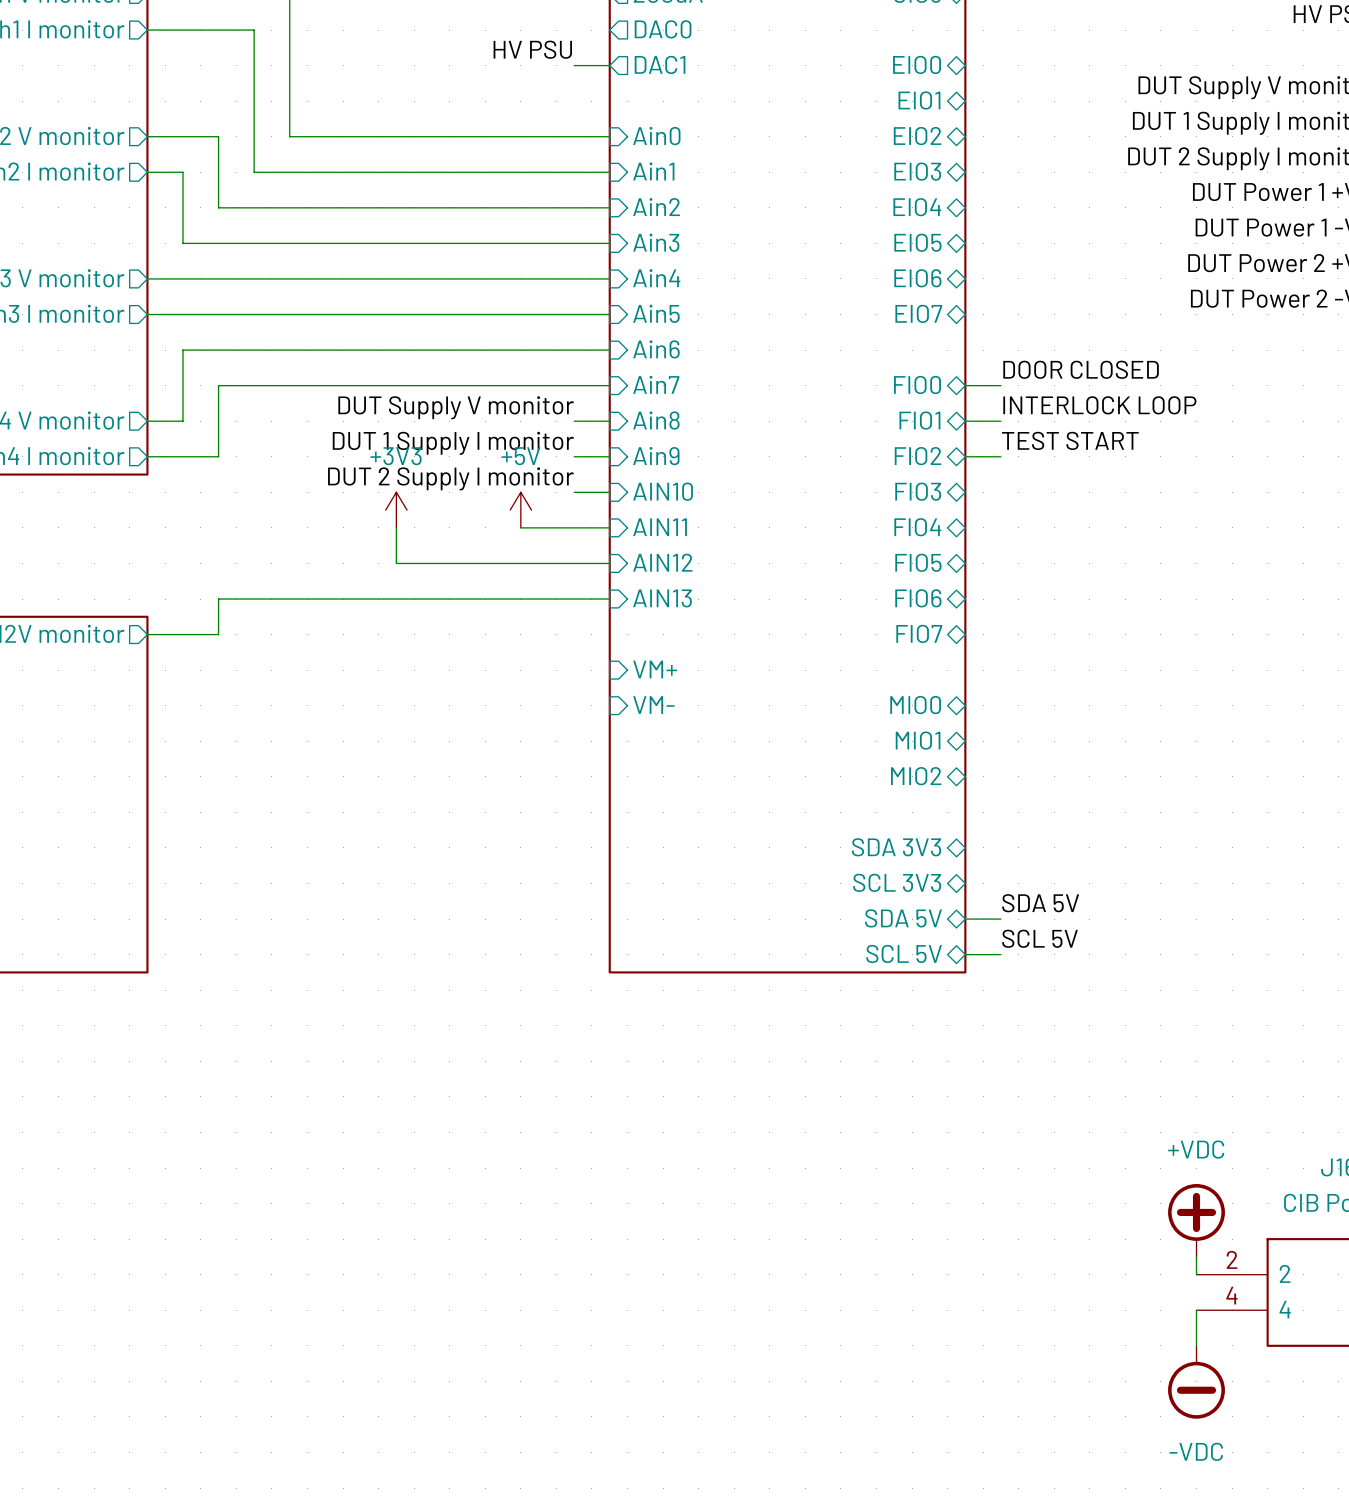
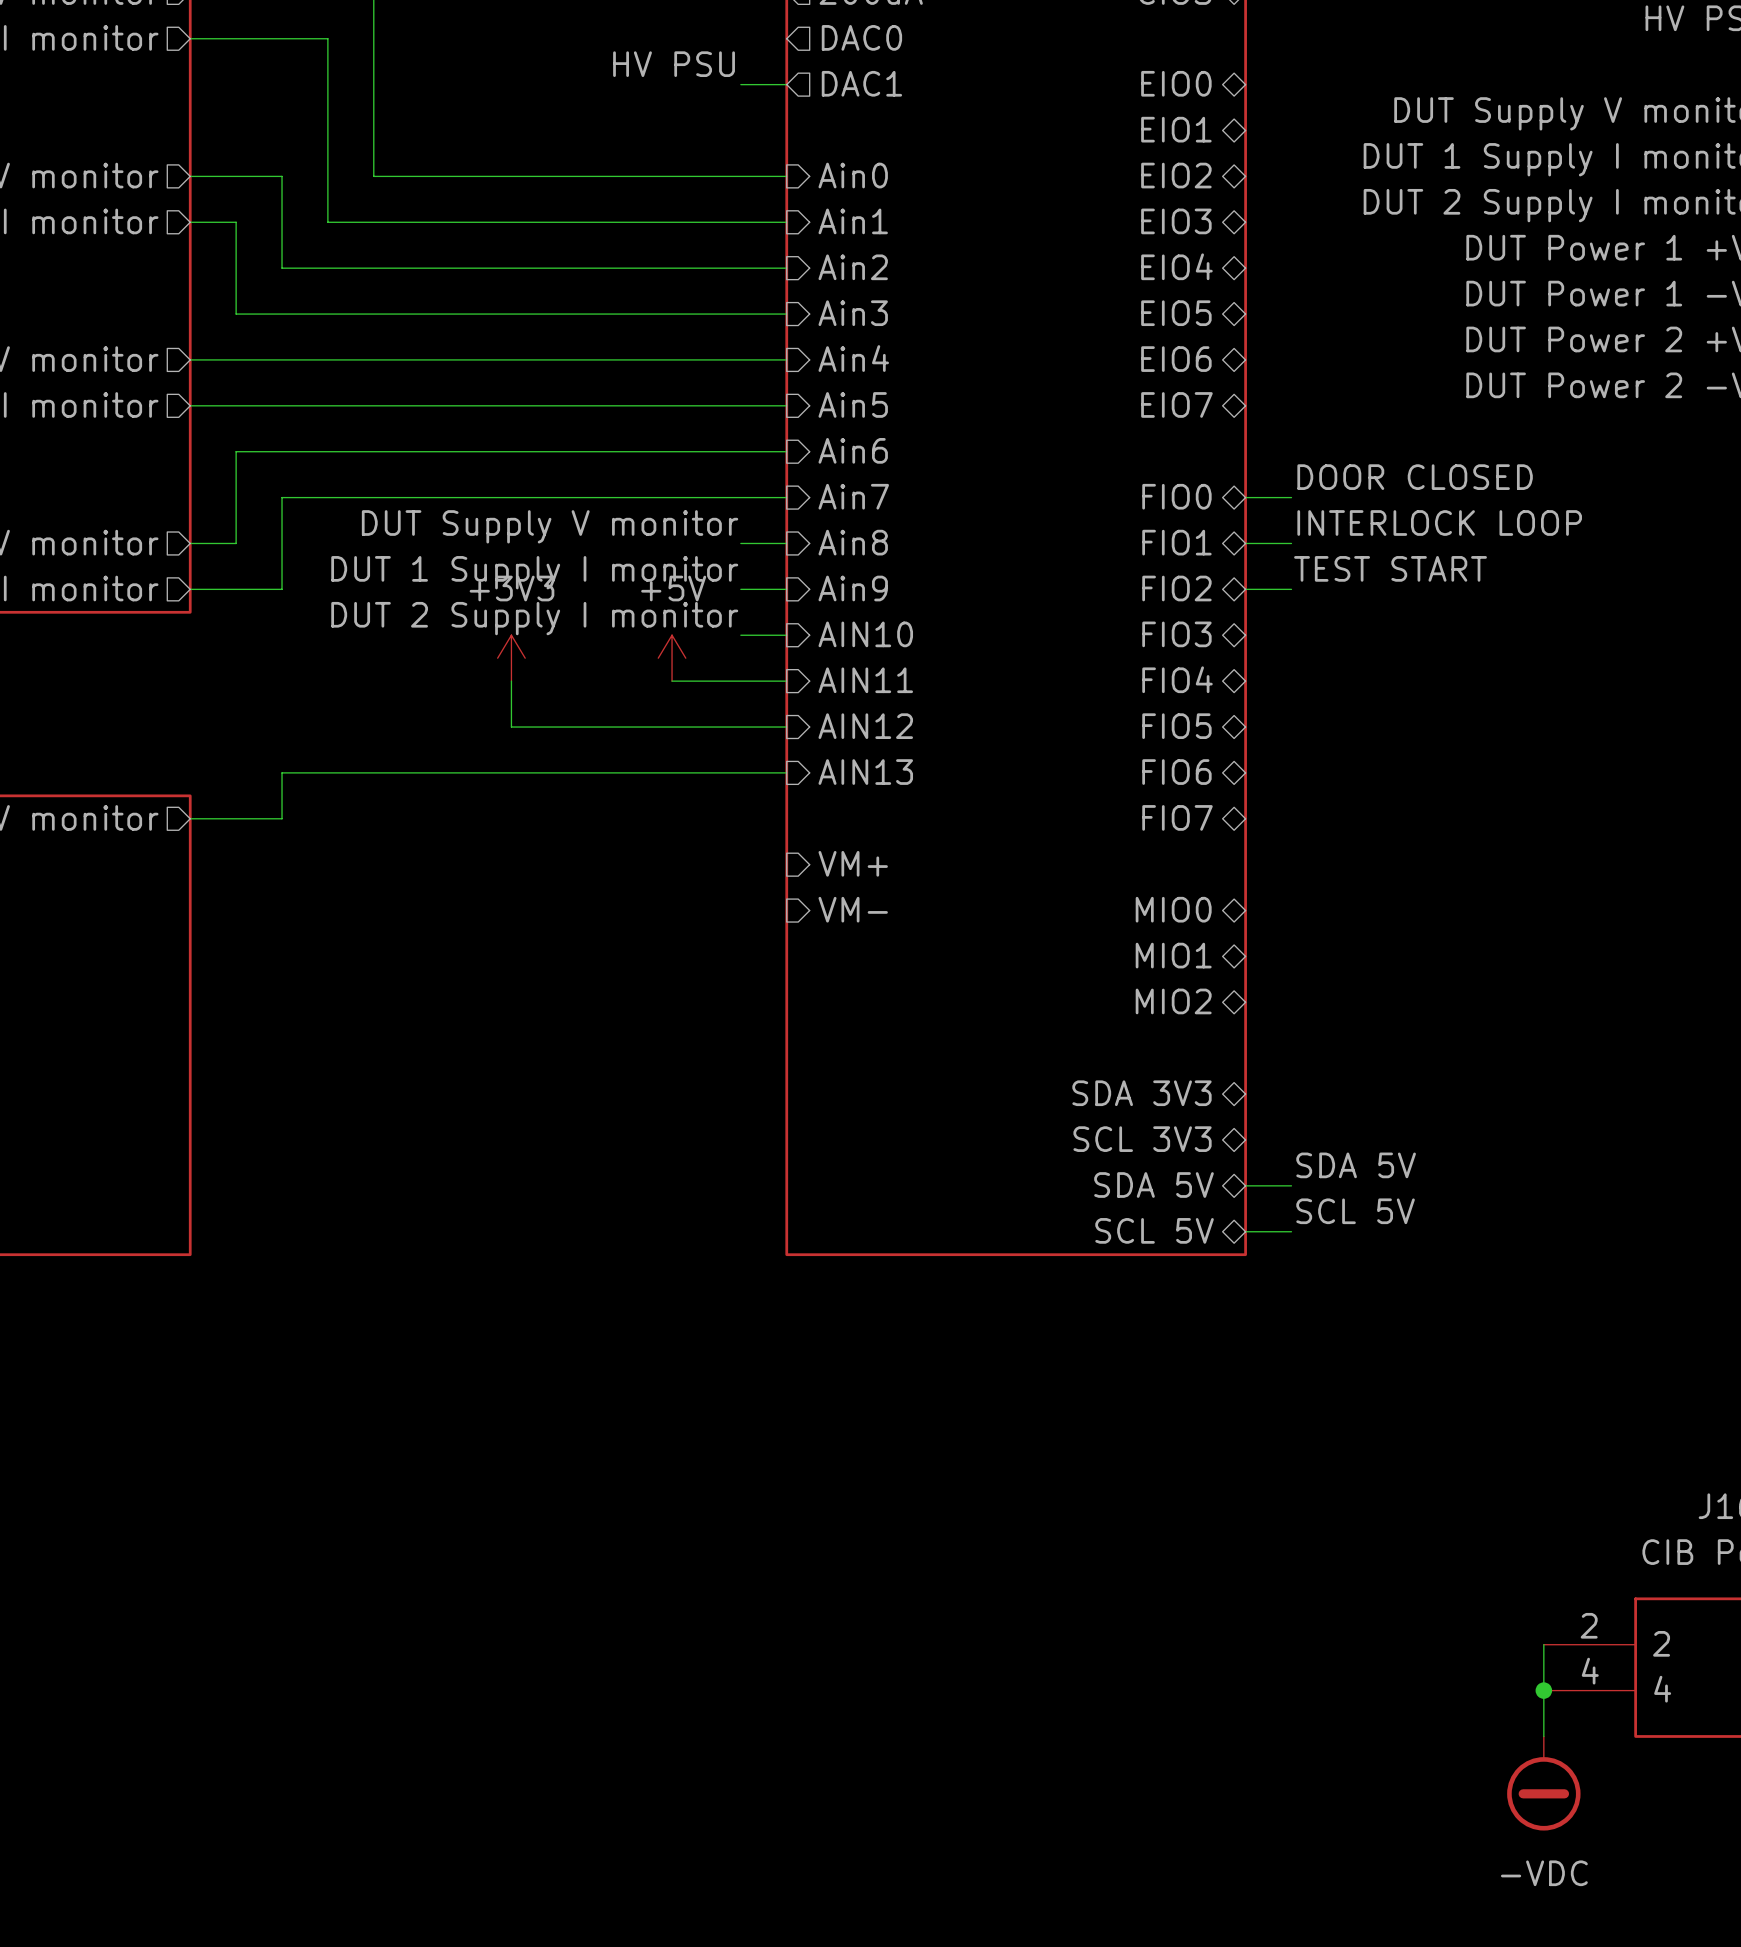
power symbol: +VDC (1196, 1220) -> none
wire: (1196, 1256) (1196, 1274) -> (1543, 1690) (1543, 1644)
junction: none -> (1543, 1690)

